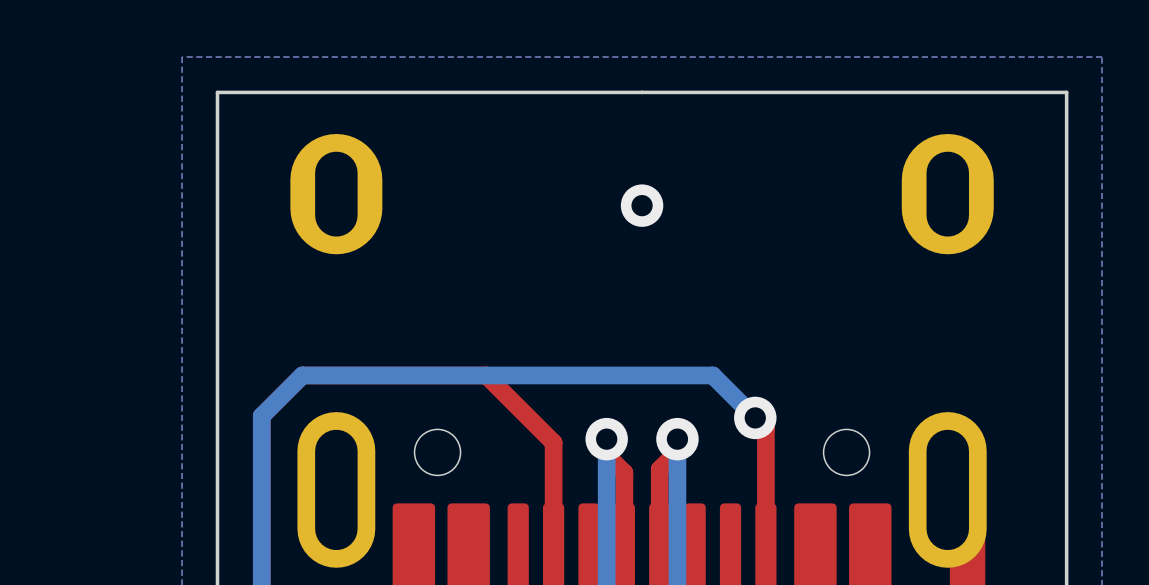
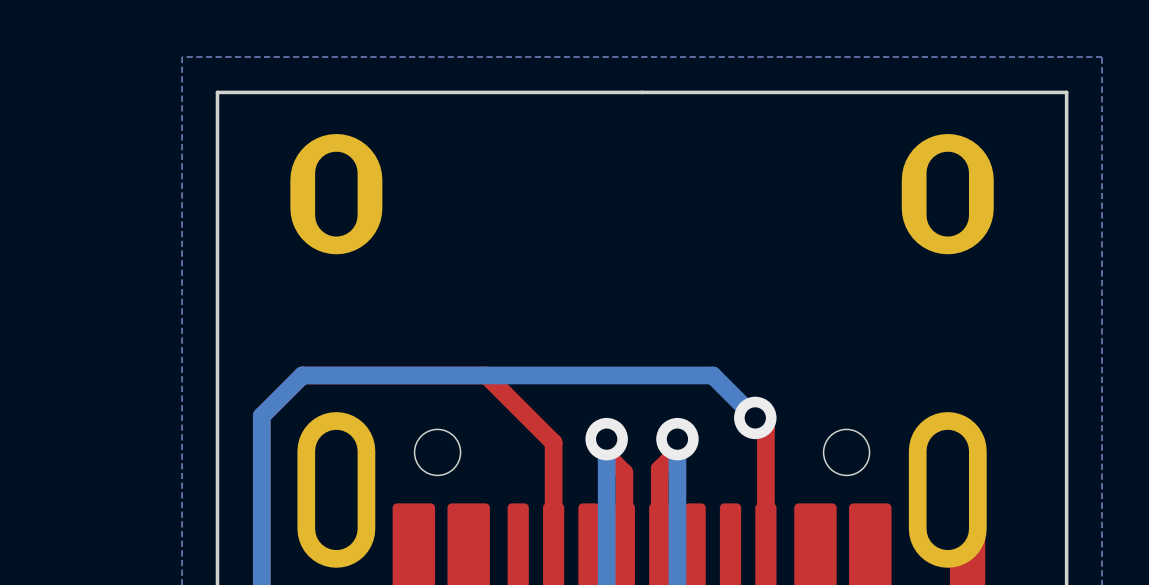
via: (642, 205) -> none

